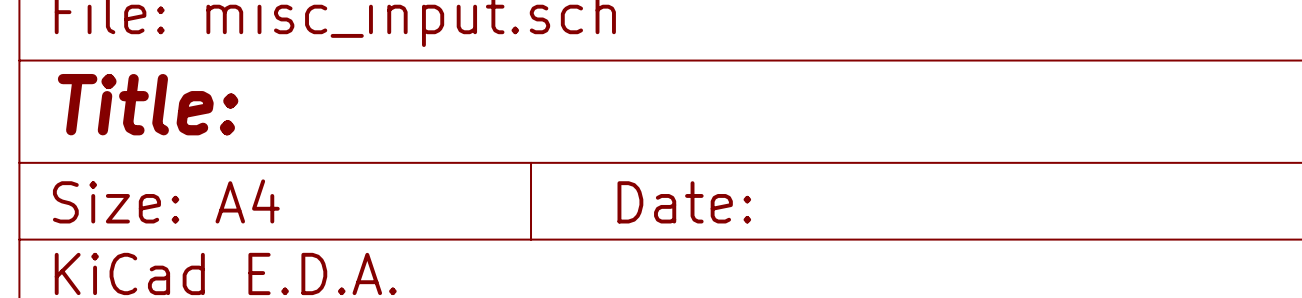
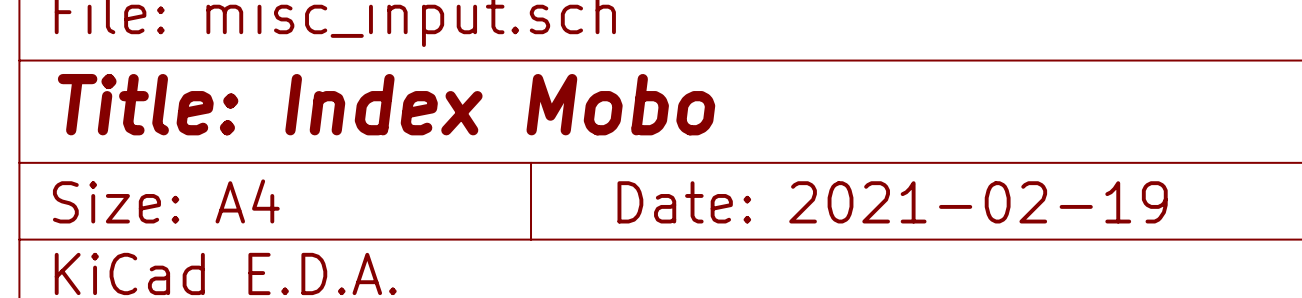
title block: Title: (148, 104) -> Title: Index Mobo (386, 104)
title block: Date: (684, 202) -> Date: 2021-02-19 (892, 202)

